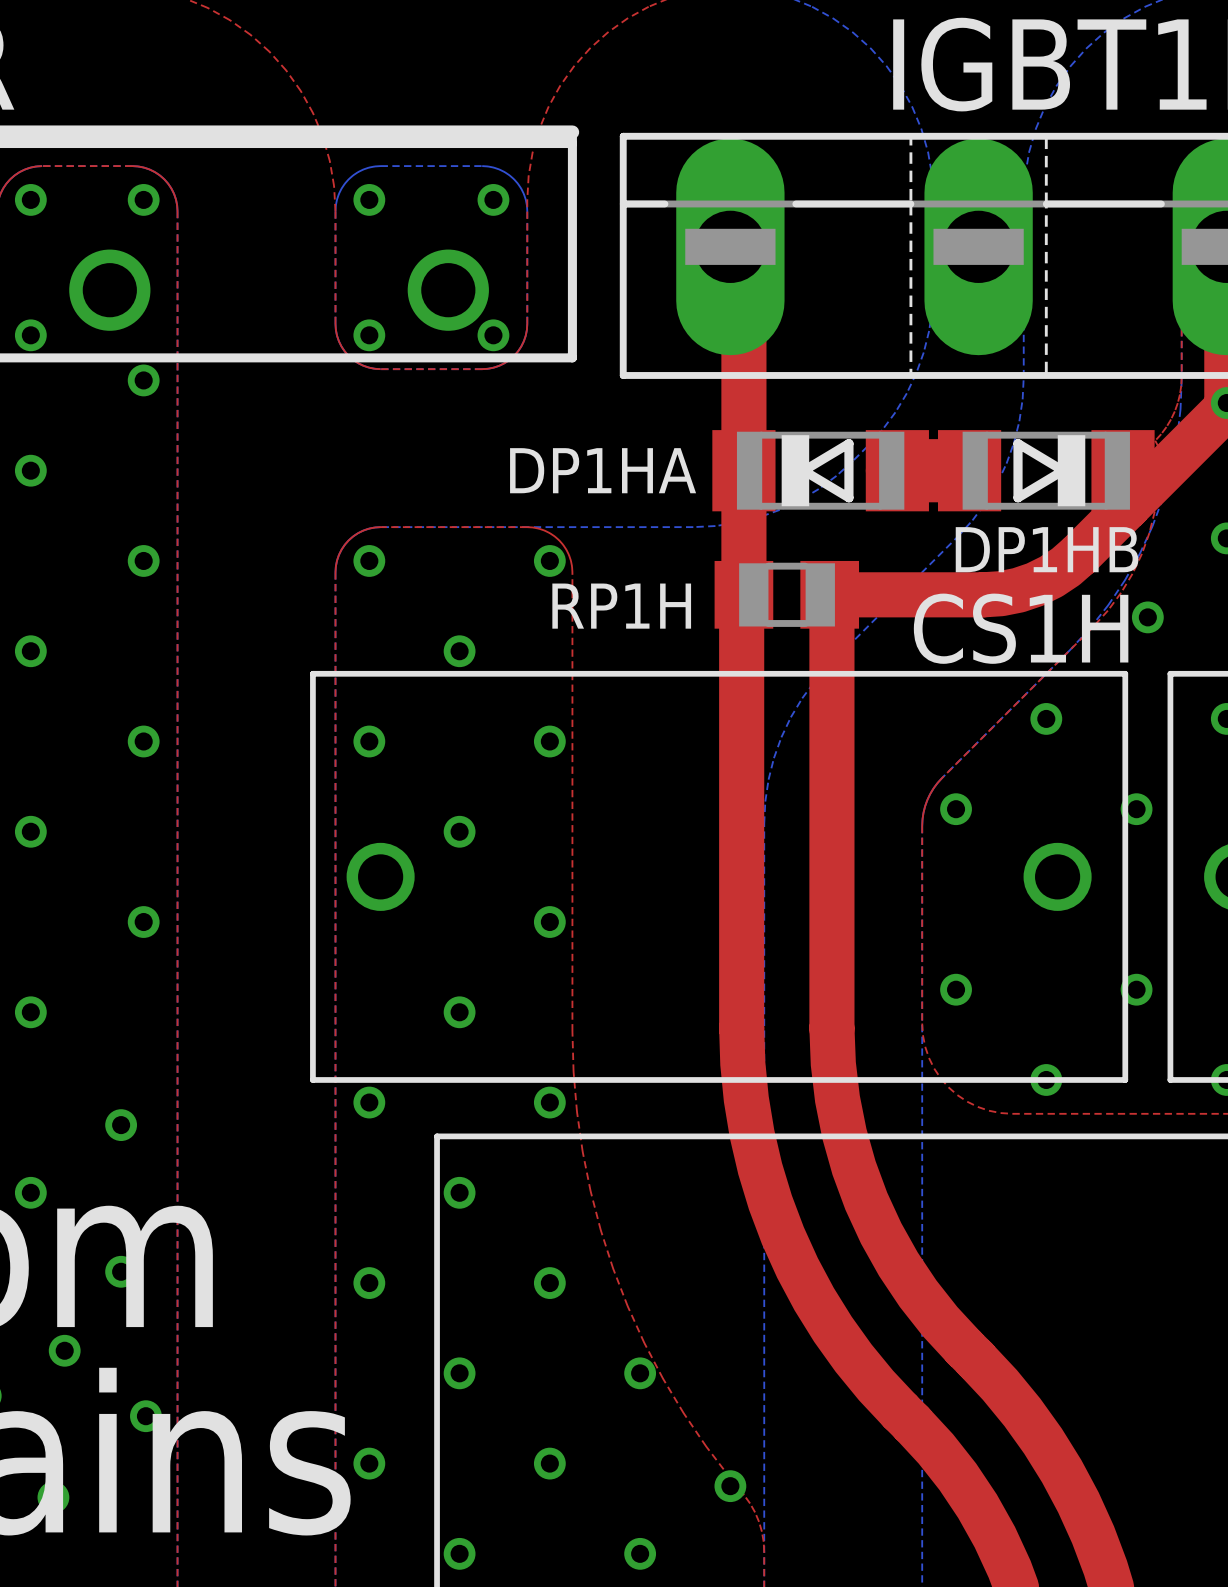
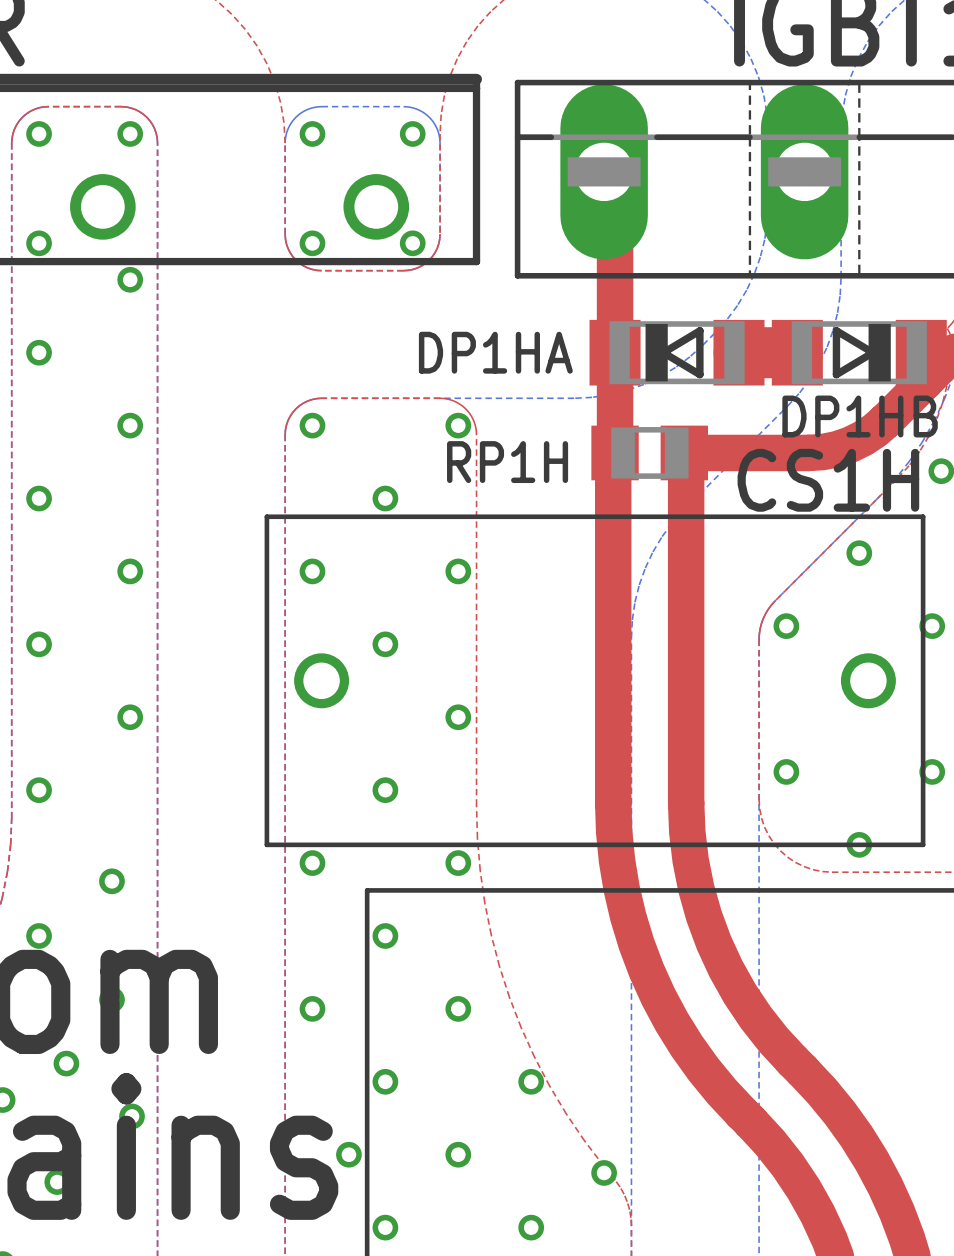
via position: (369, 1463) -> (348, 1154)

